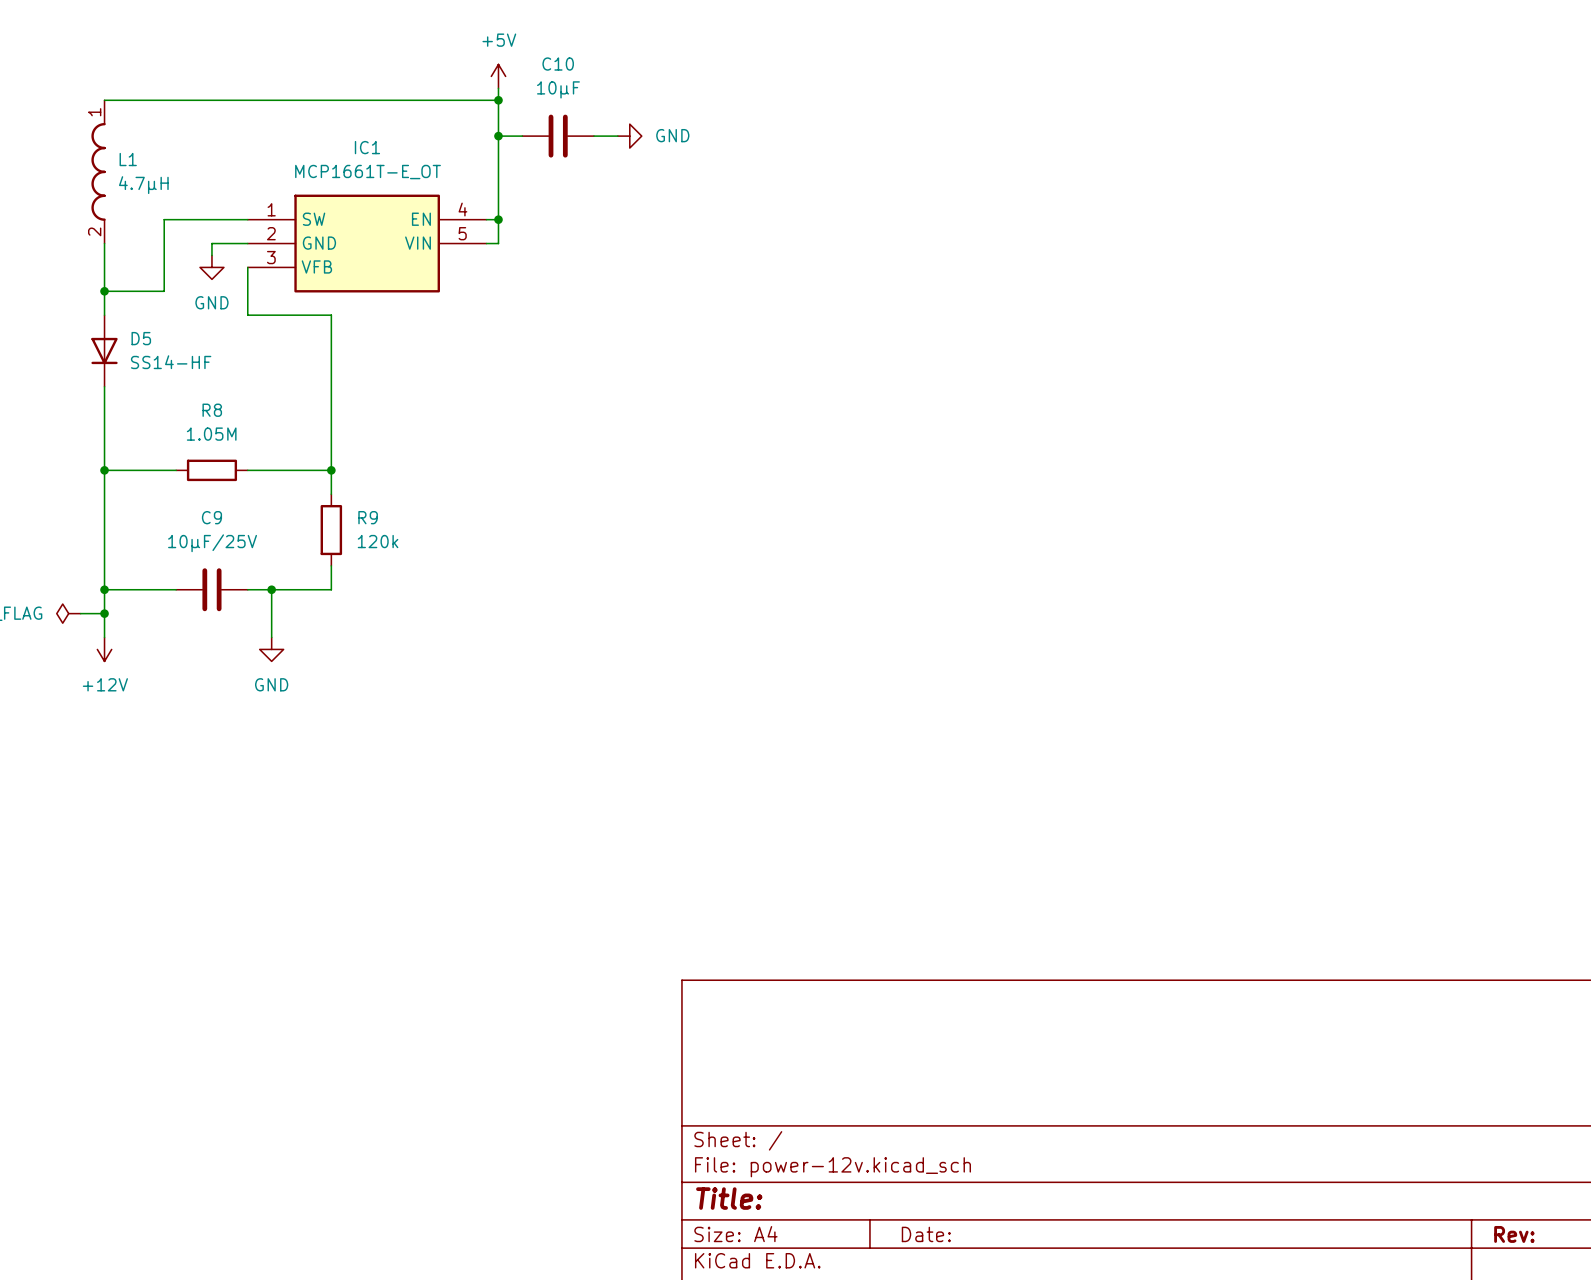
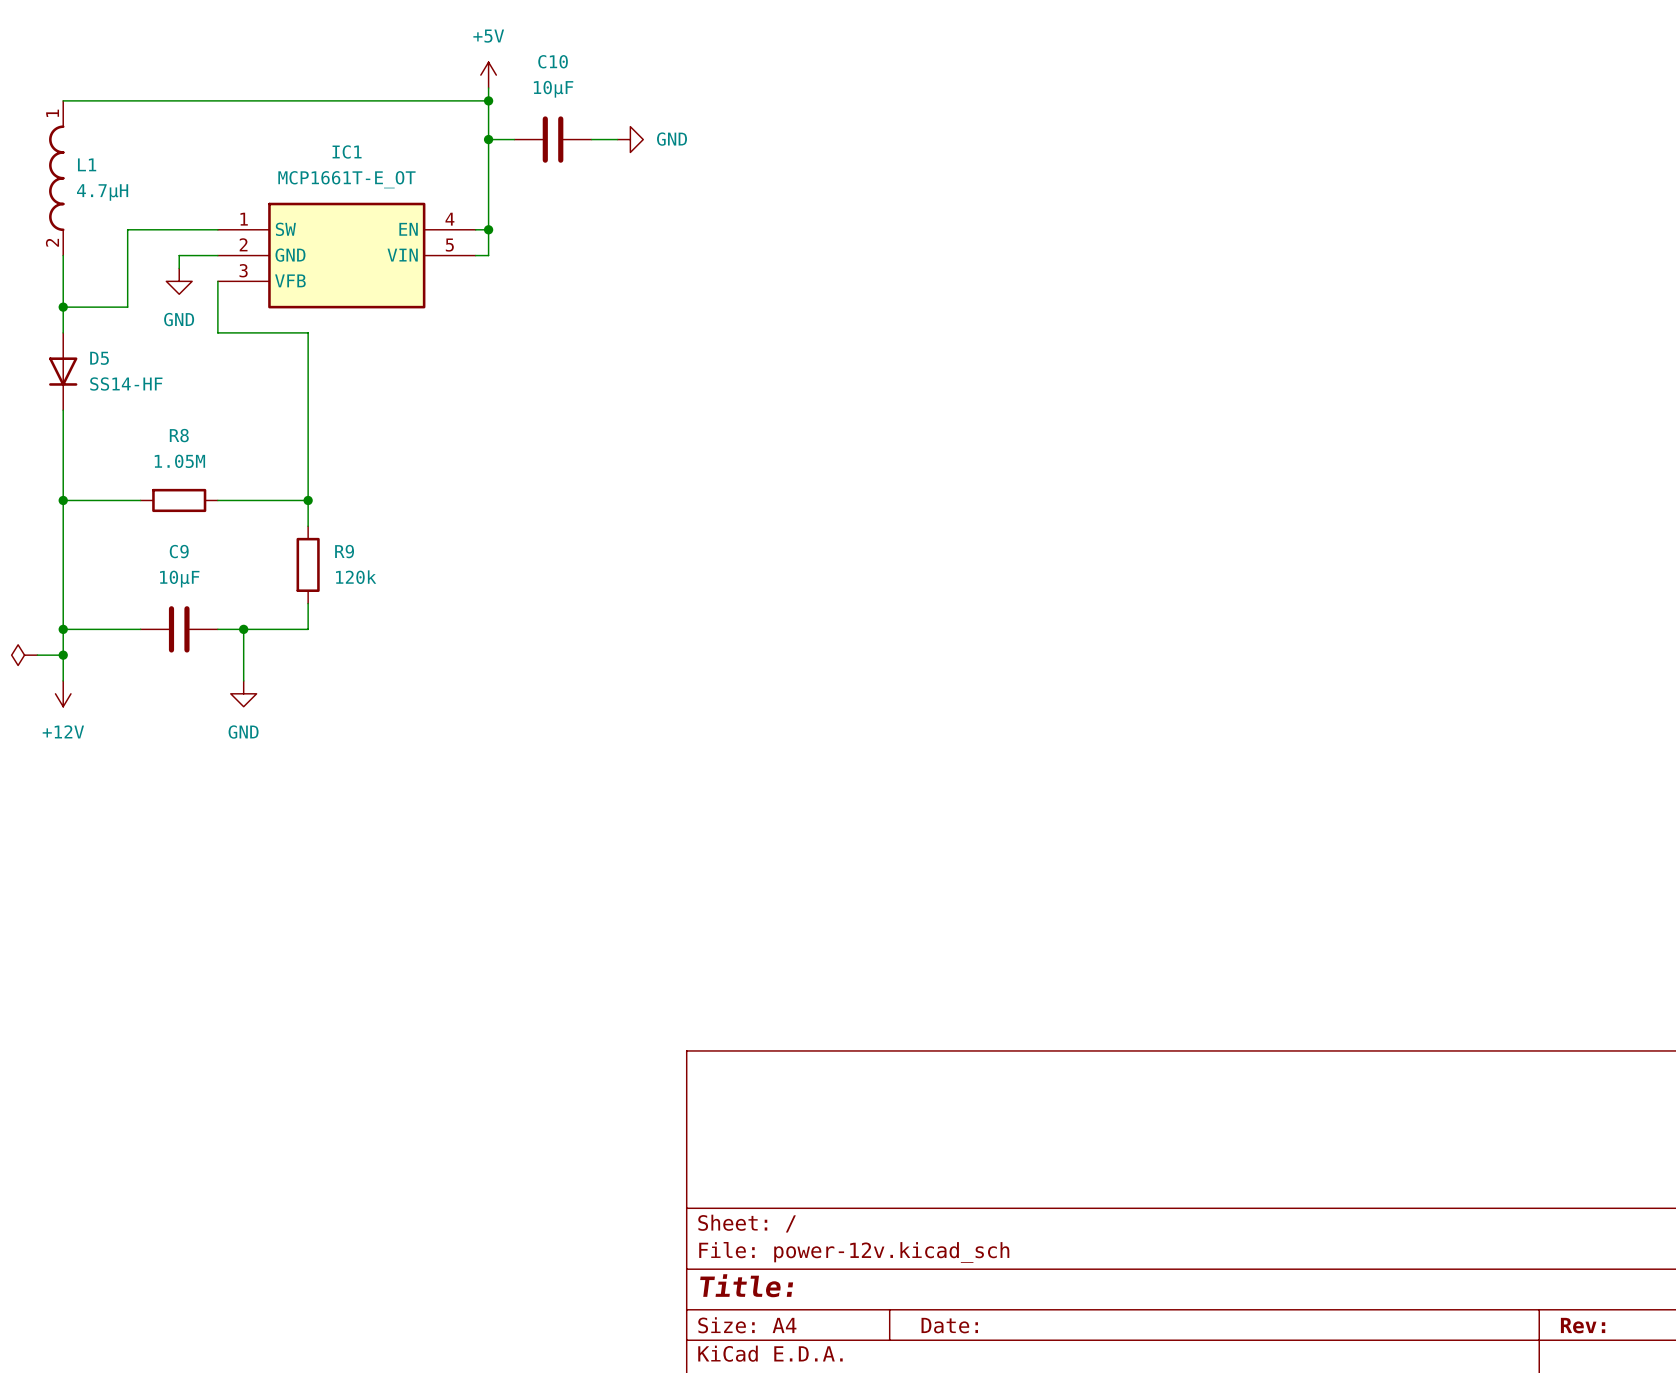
C9 value: 10µF/25V (212, 543) -> 10µF (179, 579)

